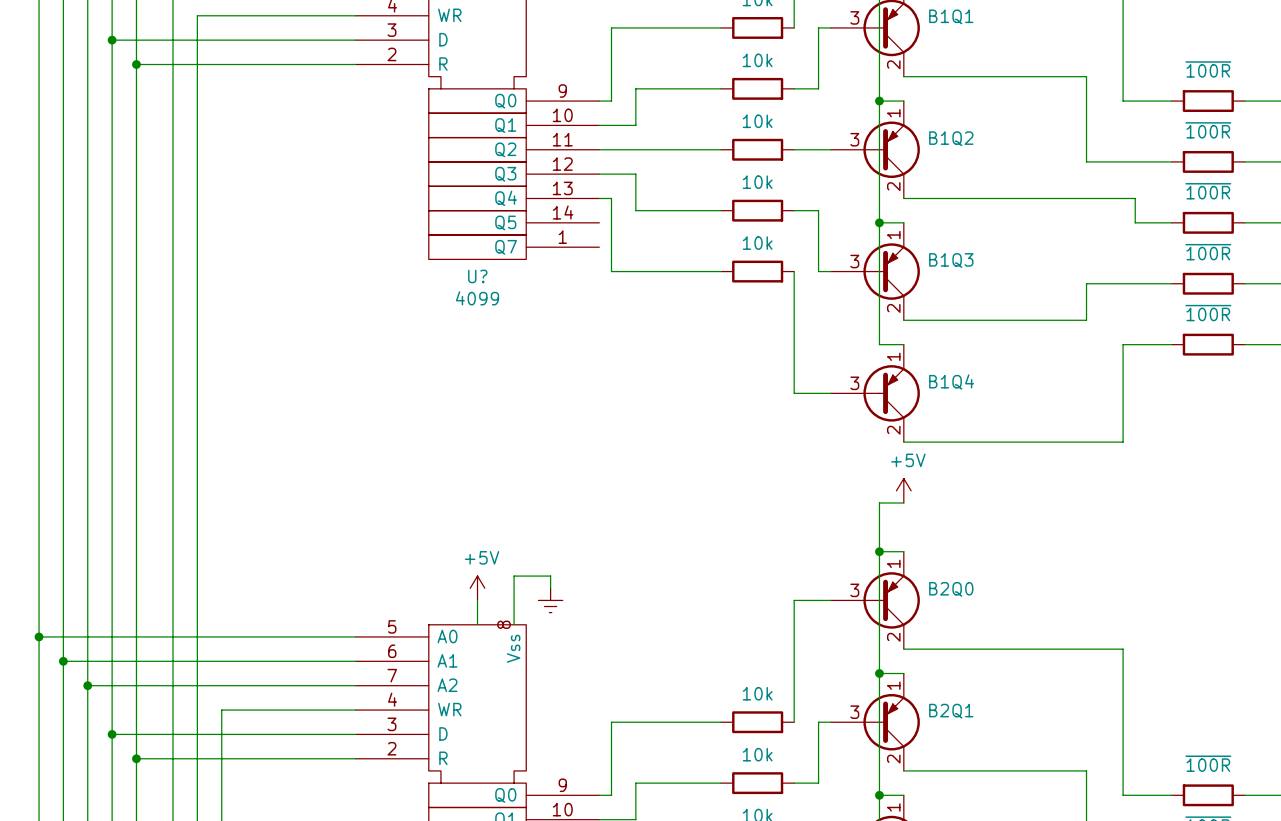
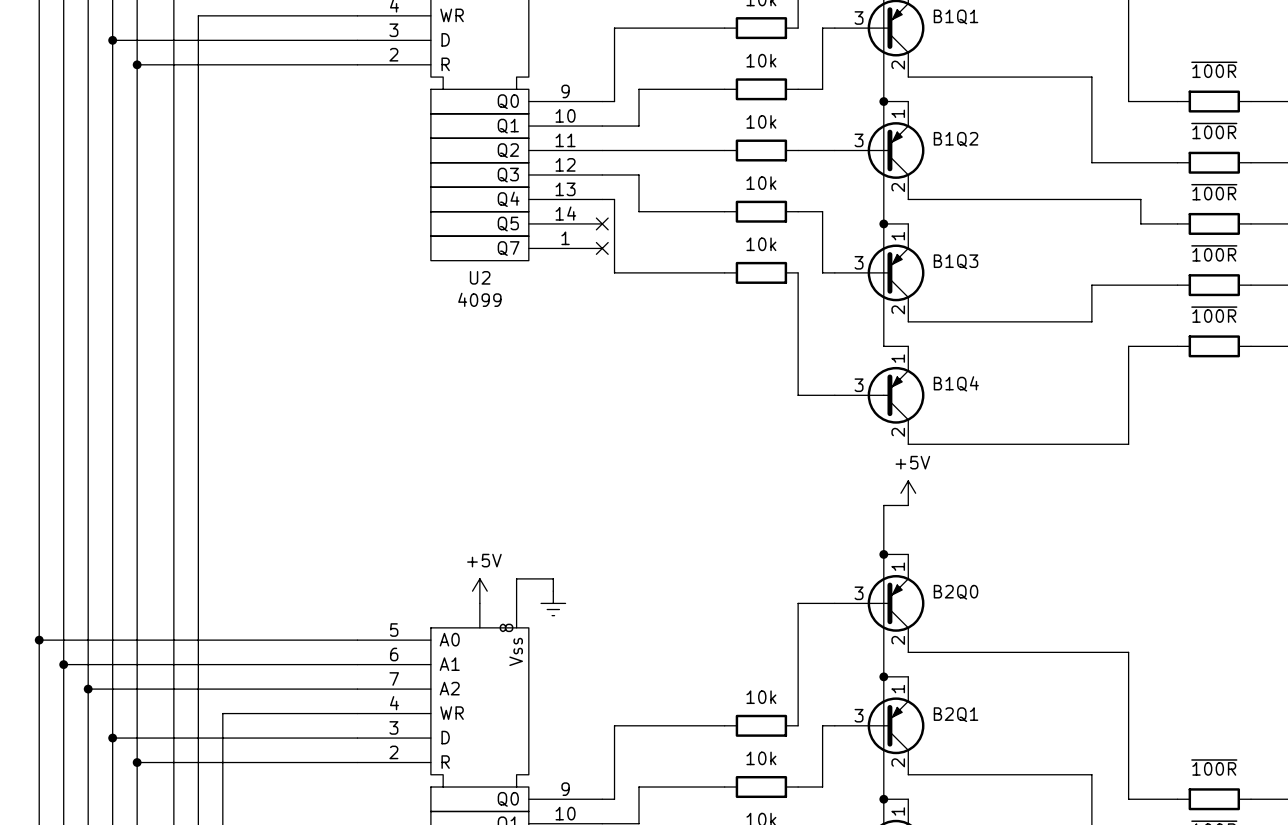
no-connect mark: none -> (602, 223)
no-connect mark: none -> (602, 248)
U? name: U? (477, 276) -> U2 (480, 277)

